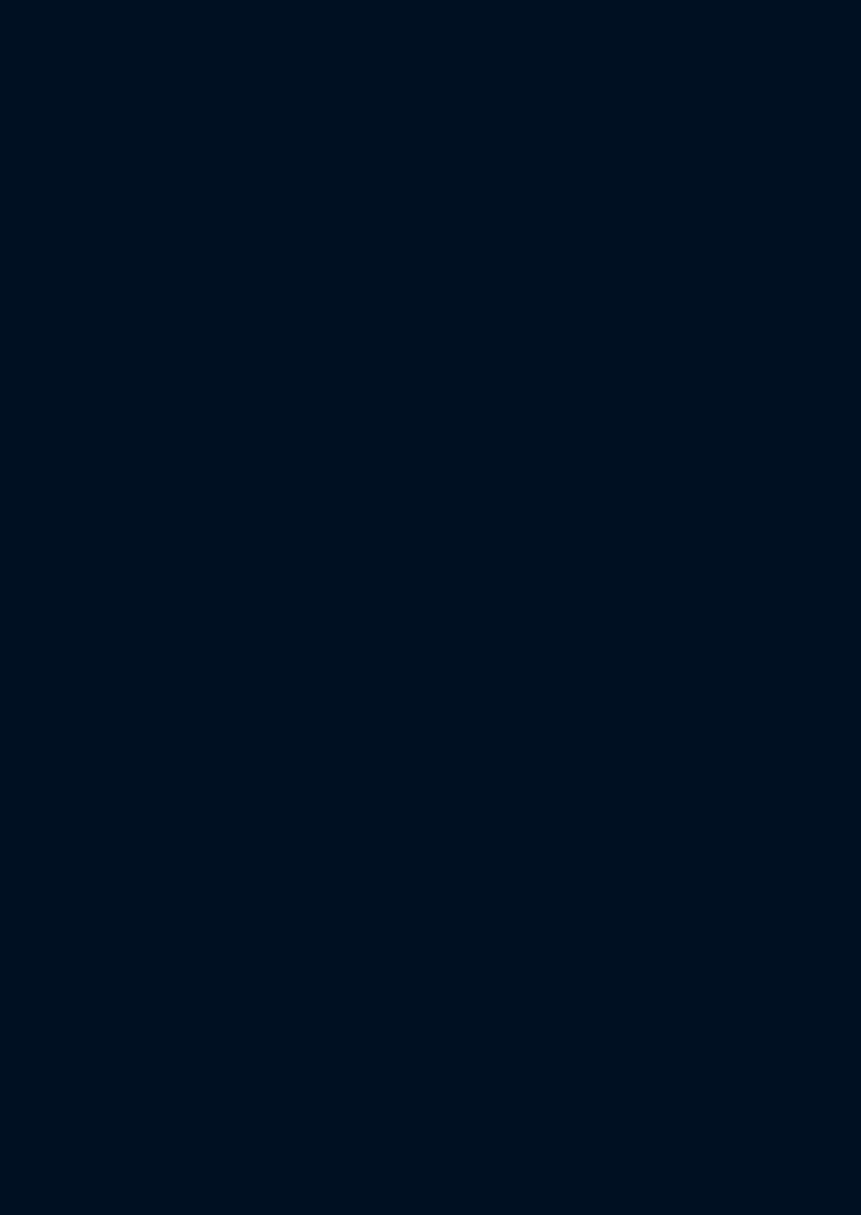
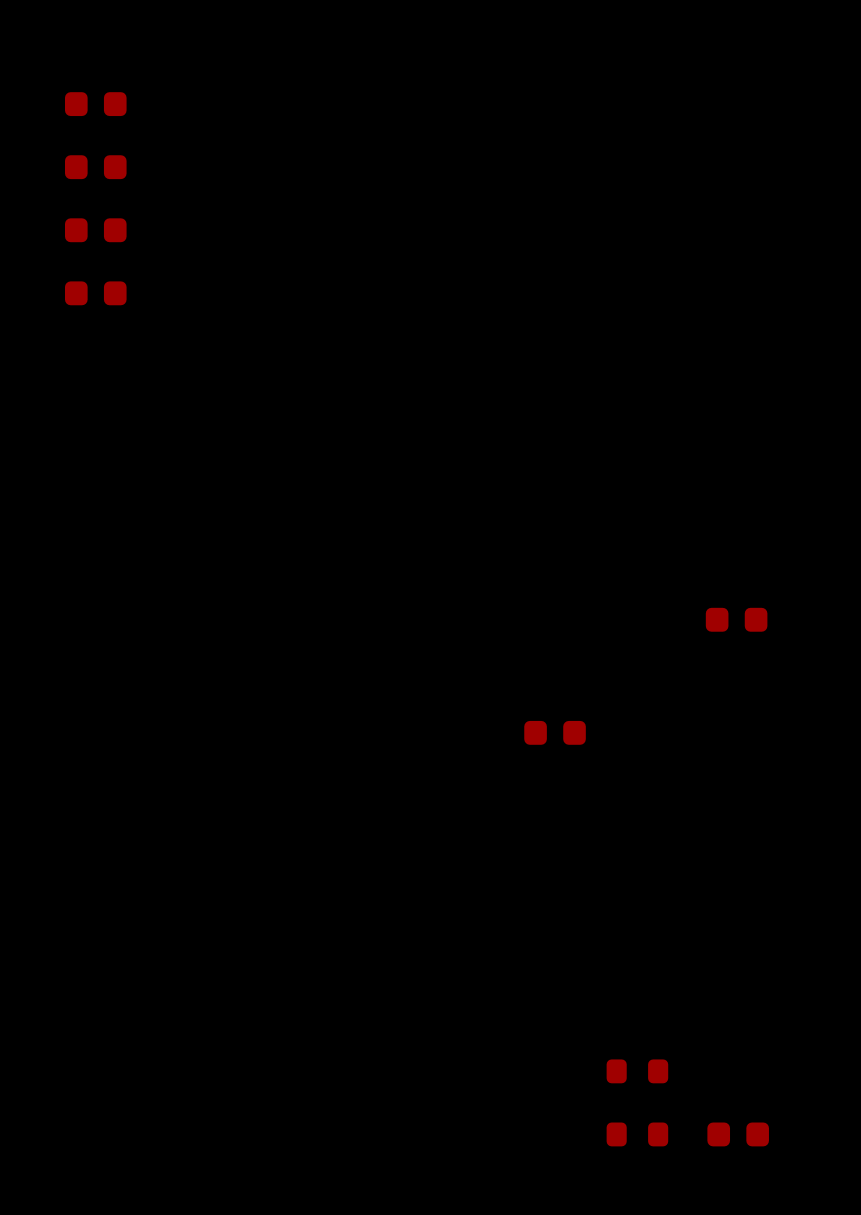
part: none -> (95, 104)
part: none -> (95, 167)
part: none -> (95, 230)
part: none -> (95, 293)
part: none -> (736, 619)
part: none -> (555, 732)
part: none -> (637, 1071)
part: none -> (637, 1134)
part: none -> (738, 1134)

